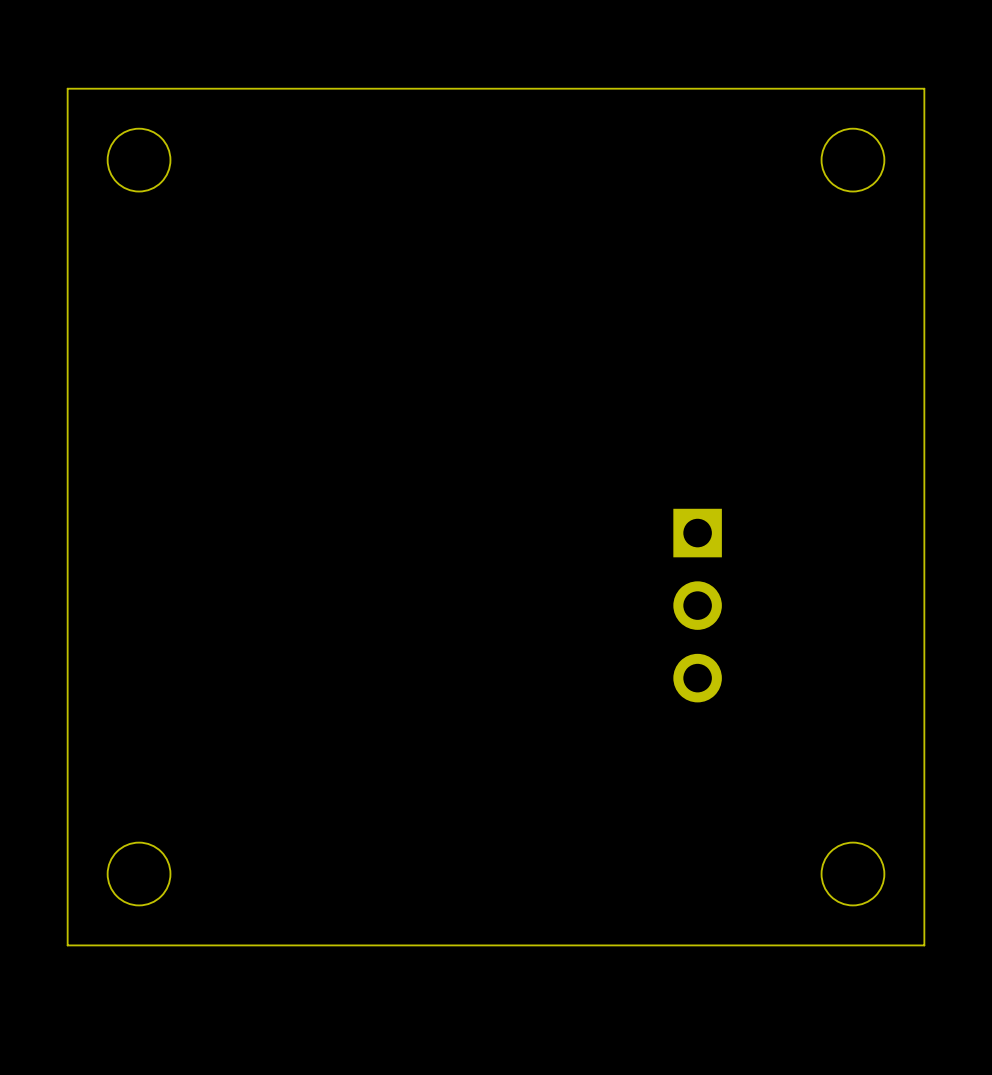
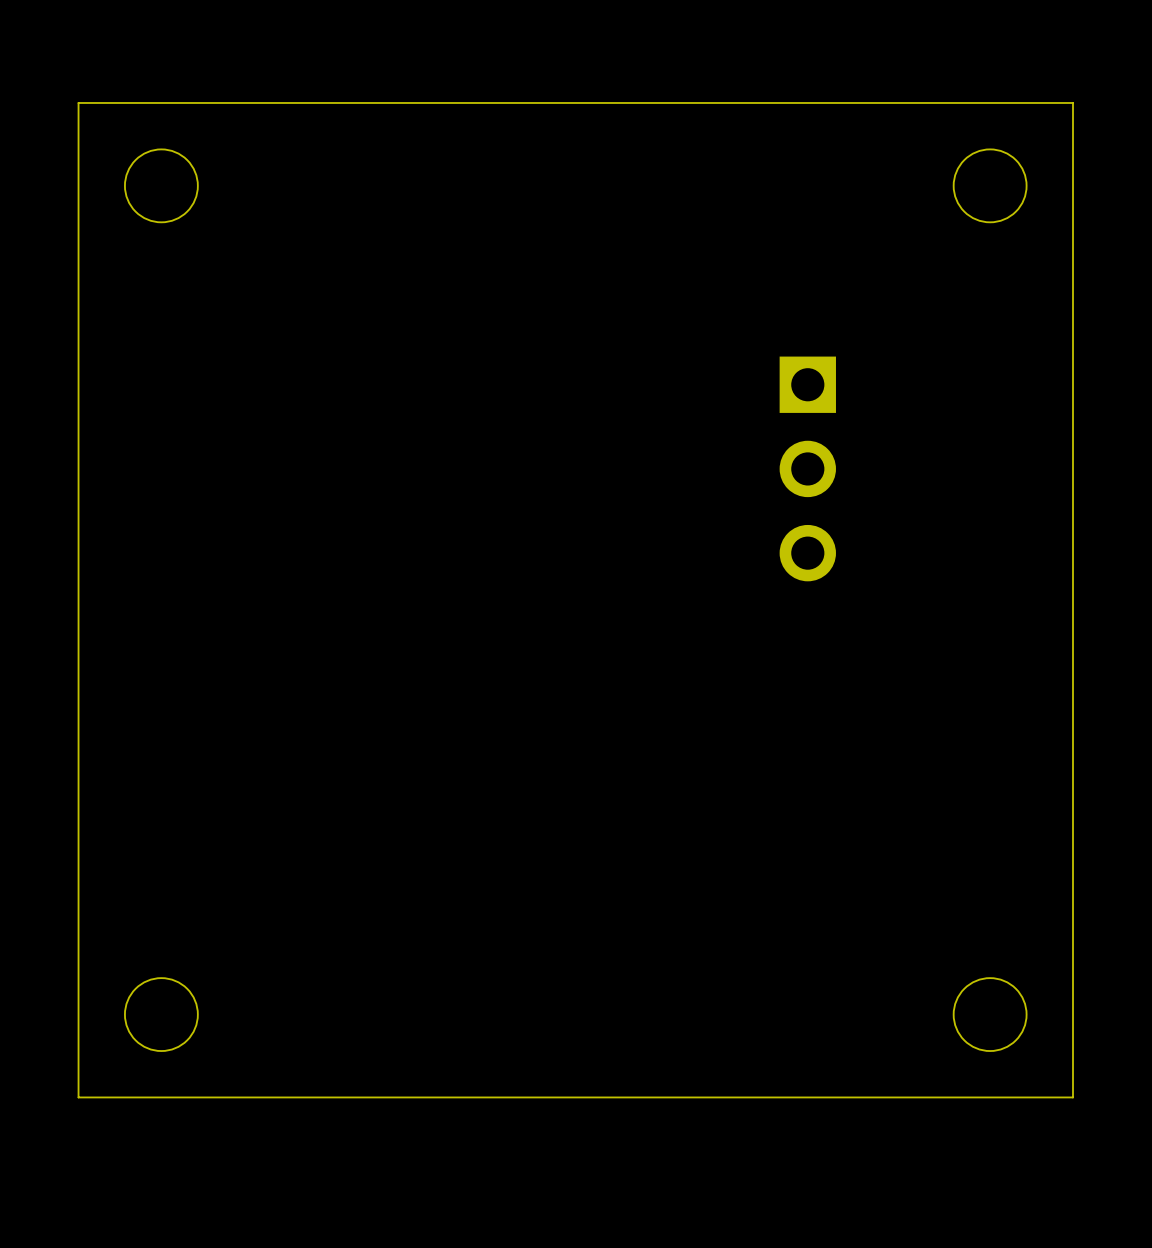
part position: (697, 605) -> (807, 468)

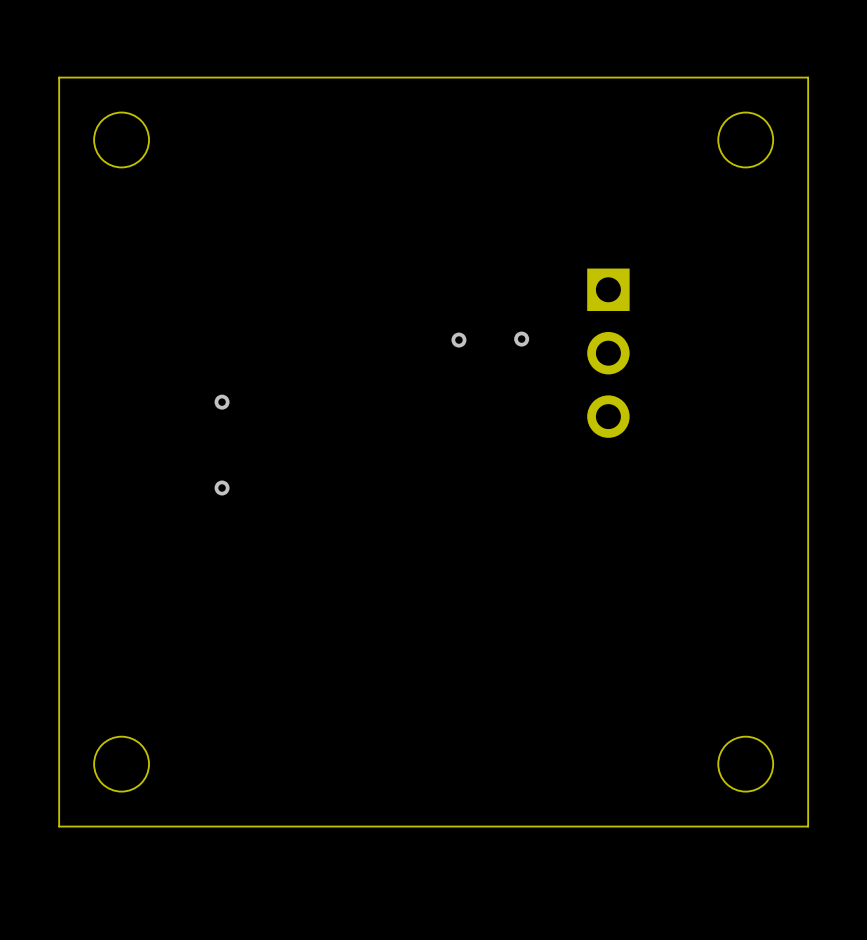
via: none -> (521, 339)
via: none -> (458, 340)
via: none -> (222, 402)
via: none -> (222, 488)

